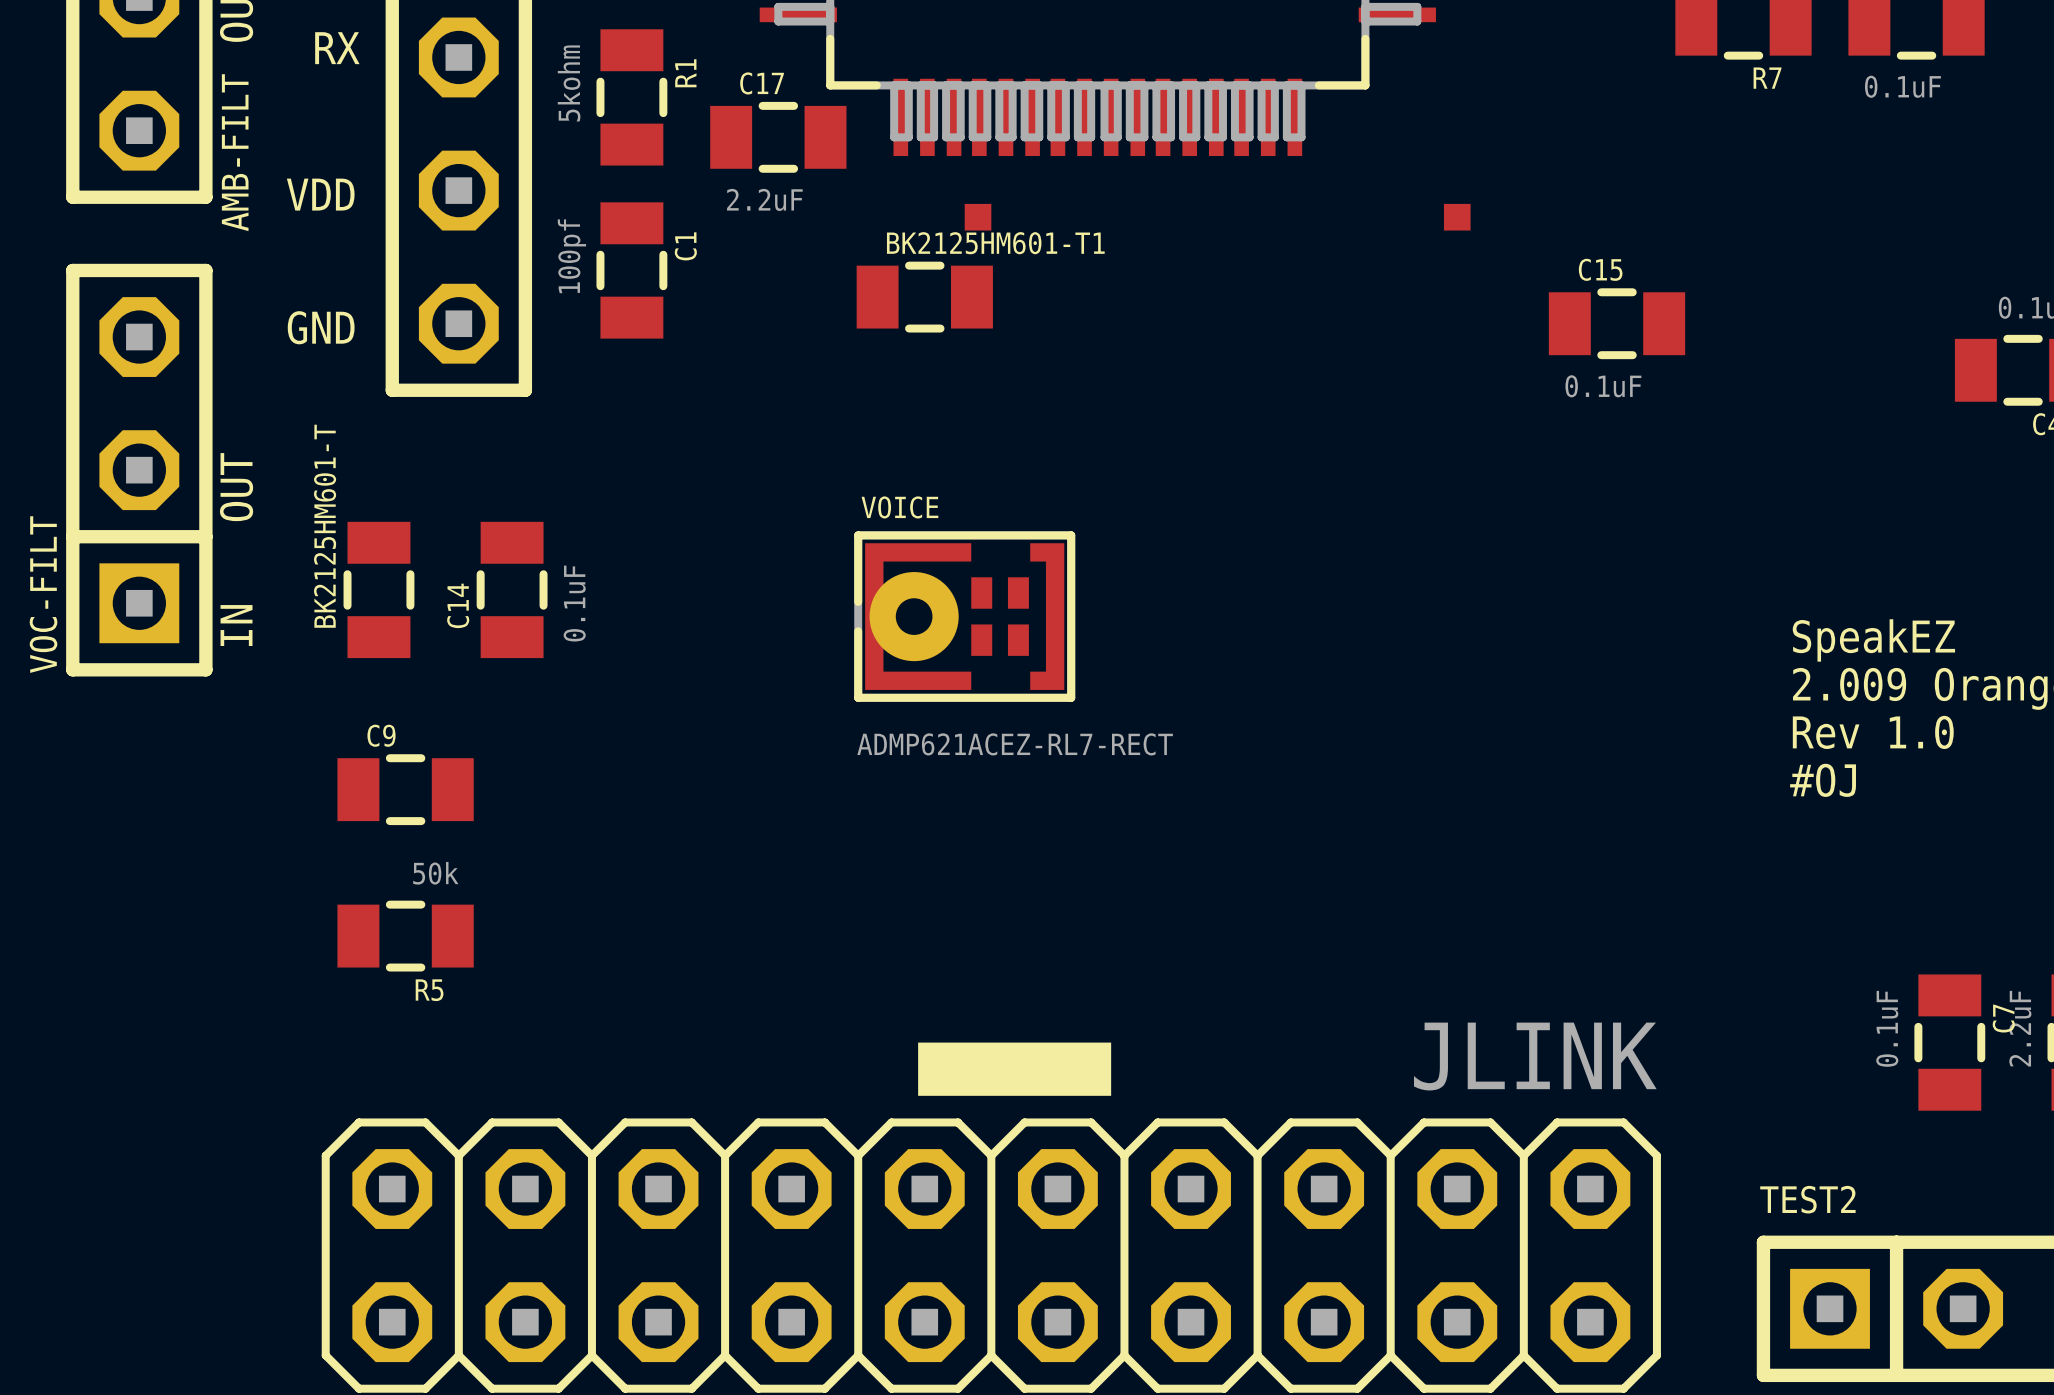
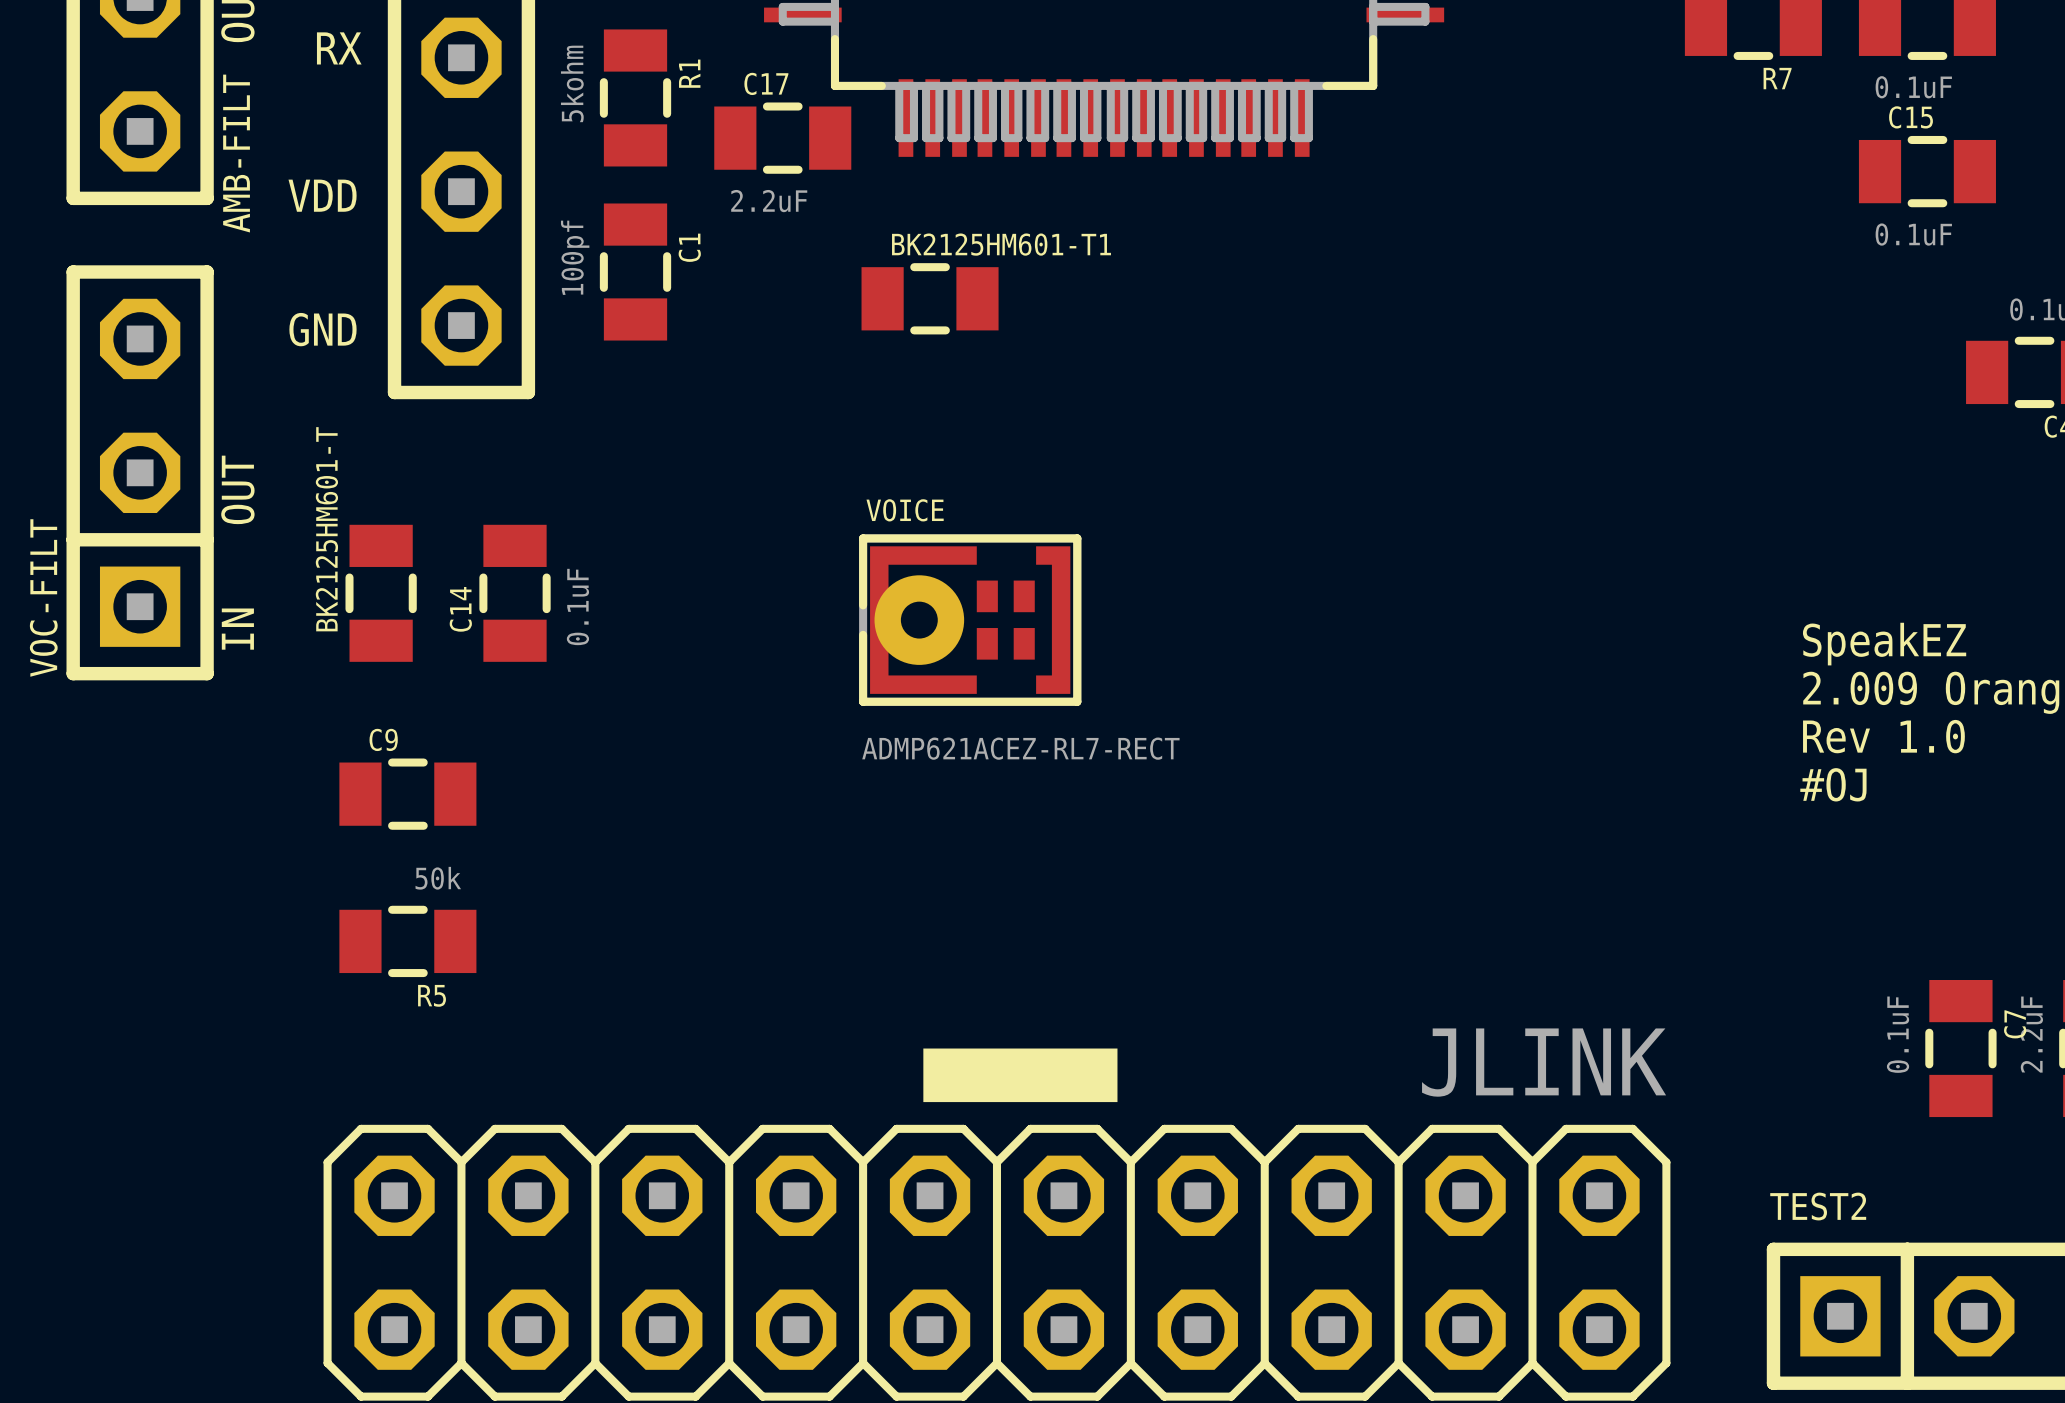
part: (978, 217) -> none
part: (1457, 217) -> none
C15 position: (1617, 323) -> (1927, 171)

